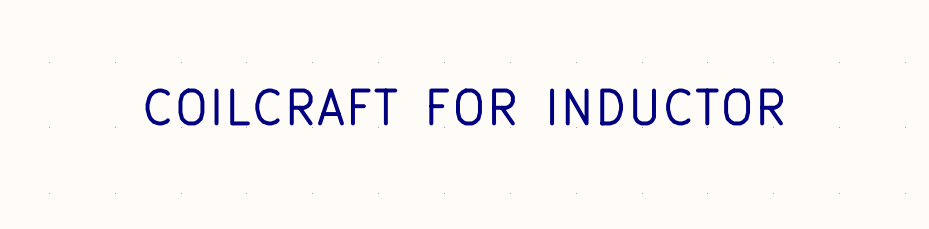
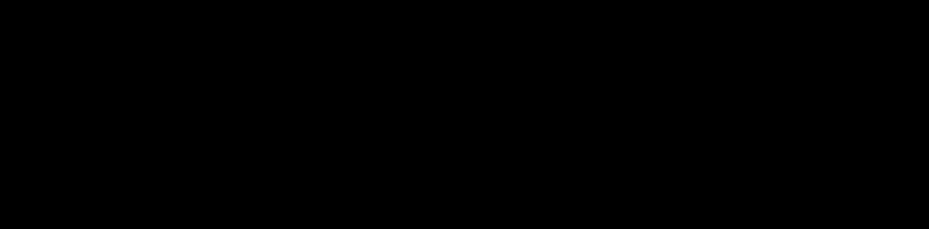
text: COILCRAFT FOR INDUCTOR (464, 106) -> none

